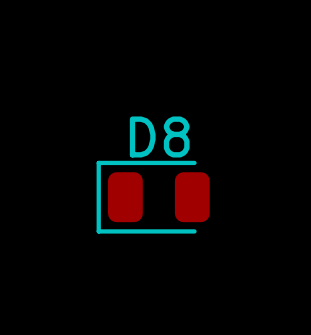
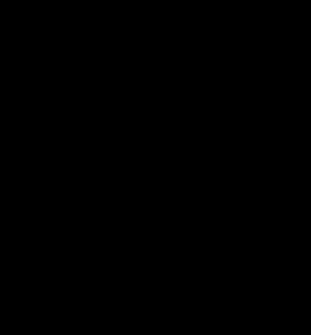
D8: (153, 197) -> none

